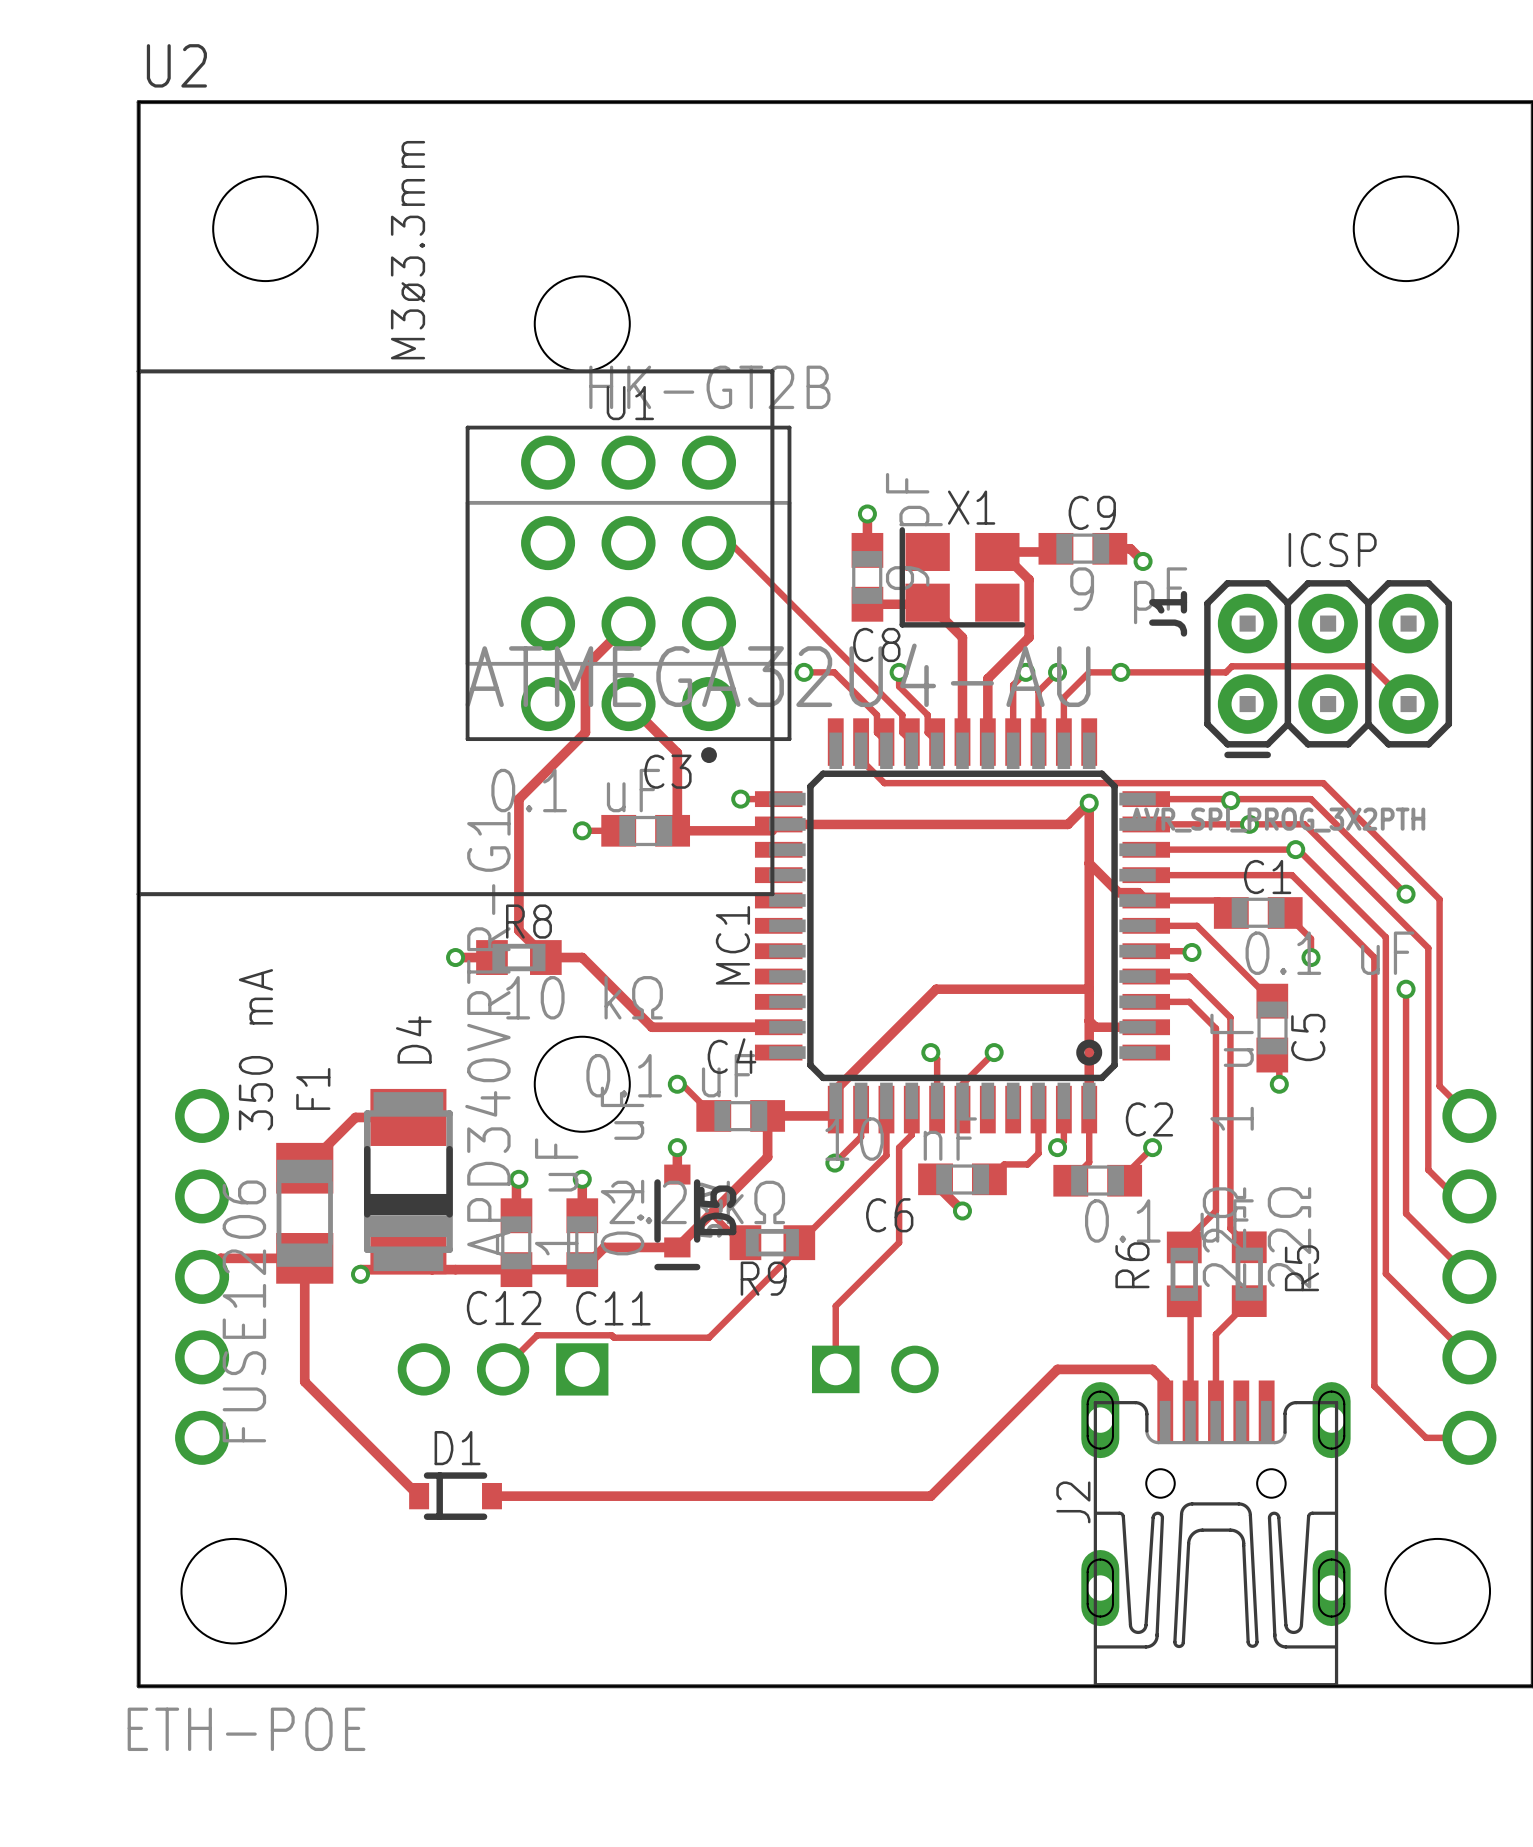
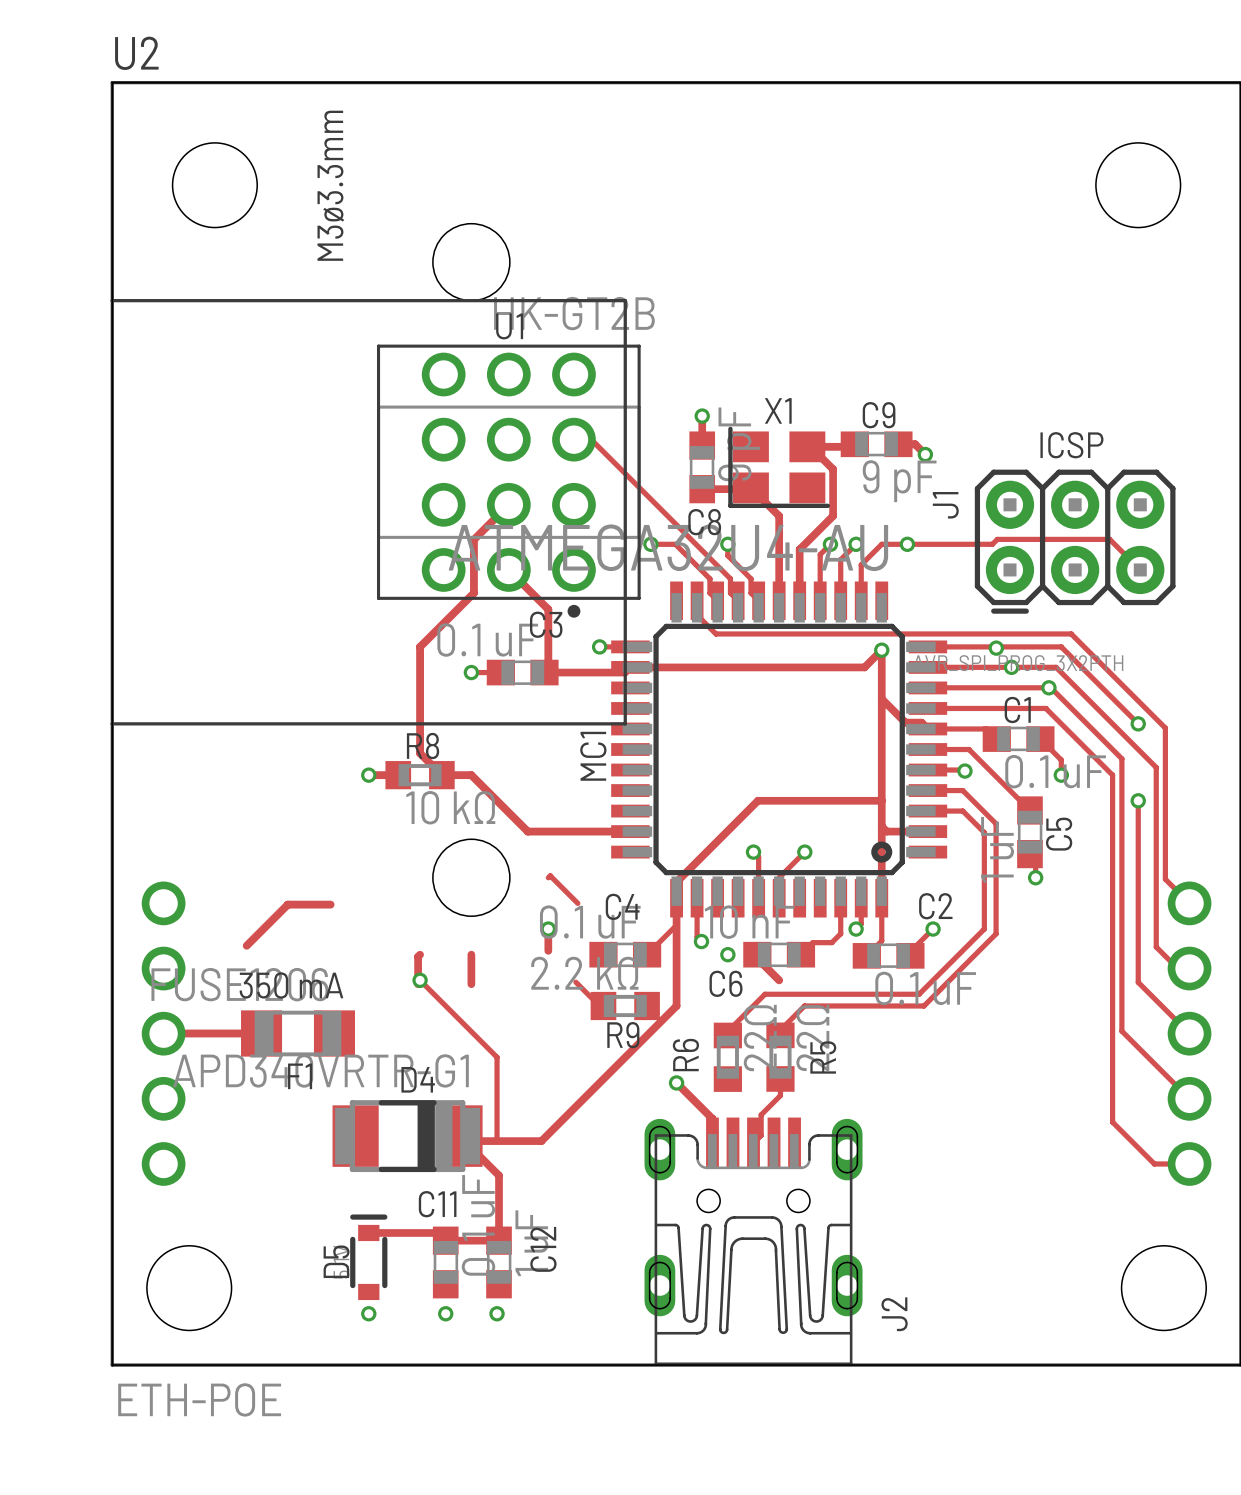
D4 name position: D4 (413, 1039) -> D4 (418, 1079)
text rotation: 0° (255, 1049) -> 90° clockwise (291, 985)
text position: 350 mA (255, 1049) -> 350 mA (291, 985)
via: (677, 1084) -> none
F1 name position: F1 (313, 1088) -> F1 (300, 1076)
track: (886, 1109) (886, 1155) (799, 1242) (799, 1247) (709, 1337) (537, 1335) (503, 1369) -> none
track: (911, 1109) (911, 1134) (899, 1147) (899, 1242) (835, 1306) (835, 1369) -> none
C4 position: (740, 1115) -> (625, 954)
track: (835, 1115) (767, 1115) (767, 1157) (677, 1247) (604, 1247) (582, 1269) (360, 1269) (360, 1274) -> none
track: (861, 1136) (834, 1163) -> (697, 920) (697, 937) (701, 941)
track: (1215, 1147) (1215, 1210) (1184, 1242) (1184, 1247) -> (984, 929) (919, 994) (764, 994) (727, 1031) (727, 1035)
track: (1230, 1153) (1230, 1228) (1249, 1247) -> (996, 933) (923, 1005) (804, 1005) (780, 1030) (780, 1035)
via position: (834, 1163) -> (701, 941)
via position: (518, 1179) -> (420, 980)
via: (582, 1179) -> none
track: none -> (647, 954) (676, 925) (676, 903) (676, 1005) (541, 1141) (464, 1141)
via: none -> (727, 954)
D4 rotation: 0° (408, 1181) -> 90° counterclockwise (407, 1136)
D4 position: (408, 1181) -> (407, 1136)
track: none -> (420, 980) (497, 1057) (497, 1141)
via: (962, 1210) -> none
F1 rotation: 0° (304, 1213) -> 90° clockwise (298, 1033)
F1 position: (304, 1213) -> (298, 1033)
D5 rotation: 0° (677, 1217) -> 180° (368, 1257)
D5 position: (677, 1217) -> (368, 1257)
C12 position: (516, 1242) -> (499, 1262)
C11 position: (582, 1242) -> (445, 1262)
via: (360, 1274) -> none
R6 position: (1184, 1274) -> (727, 1057)
R5 position: (1249, 1274) -> (780, 1057)
track: (202, 1276) (220, 1258) (304, 1258) (304, 1381) (419, 1496) -> (163, 1033) (261, 1033)
track: (1184, 1301) (1190, 1307) (1190, 1412) -> none
track: (1249, 1301) (1215, 1334) (1215, 1412) -> none
C12 name rotation: 0° (504, 1307) -> 90° counterclockwise (543, 1249)
C11 name position: C11 (613, 1308) -> C11 (437, 1204)
track: none -> (780, 1078) (780, 1095) (761, 1114) (761, 1135) (753, 1143)
track: none -> (676, 1082) (712, 1118) (712, 1143)
via: none -> (676, 1082)
part: (503, 1369) -> none
part: (875, 1369) -> none
track: none -> (459, 1136) (499, 1175) (499, 1240) (445, 1240) (445, 1232) (368, 1232)
track: (1165, 1412) (1165, 1382) (1152, 1369) (1057, 1369) (930, 1496) (491, 1496) -> none
D1: (455, 1496) -> none
J2 name position: J2 (1073, 1502) -> J2 (894, 1314)
J2 position: (1215, 1533) -> (753, 1241)
via: none -> (368, 1313)
via: none -> (445, 1313)
via: none -> (497, 1313)

